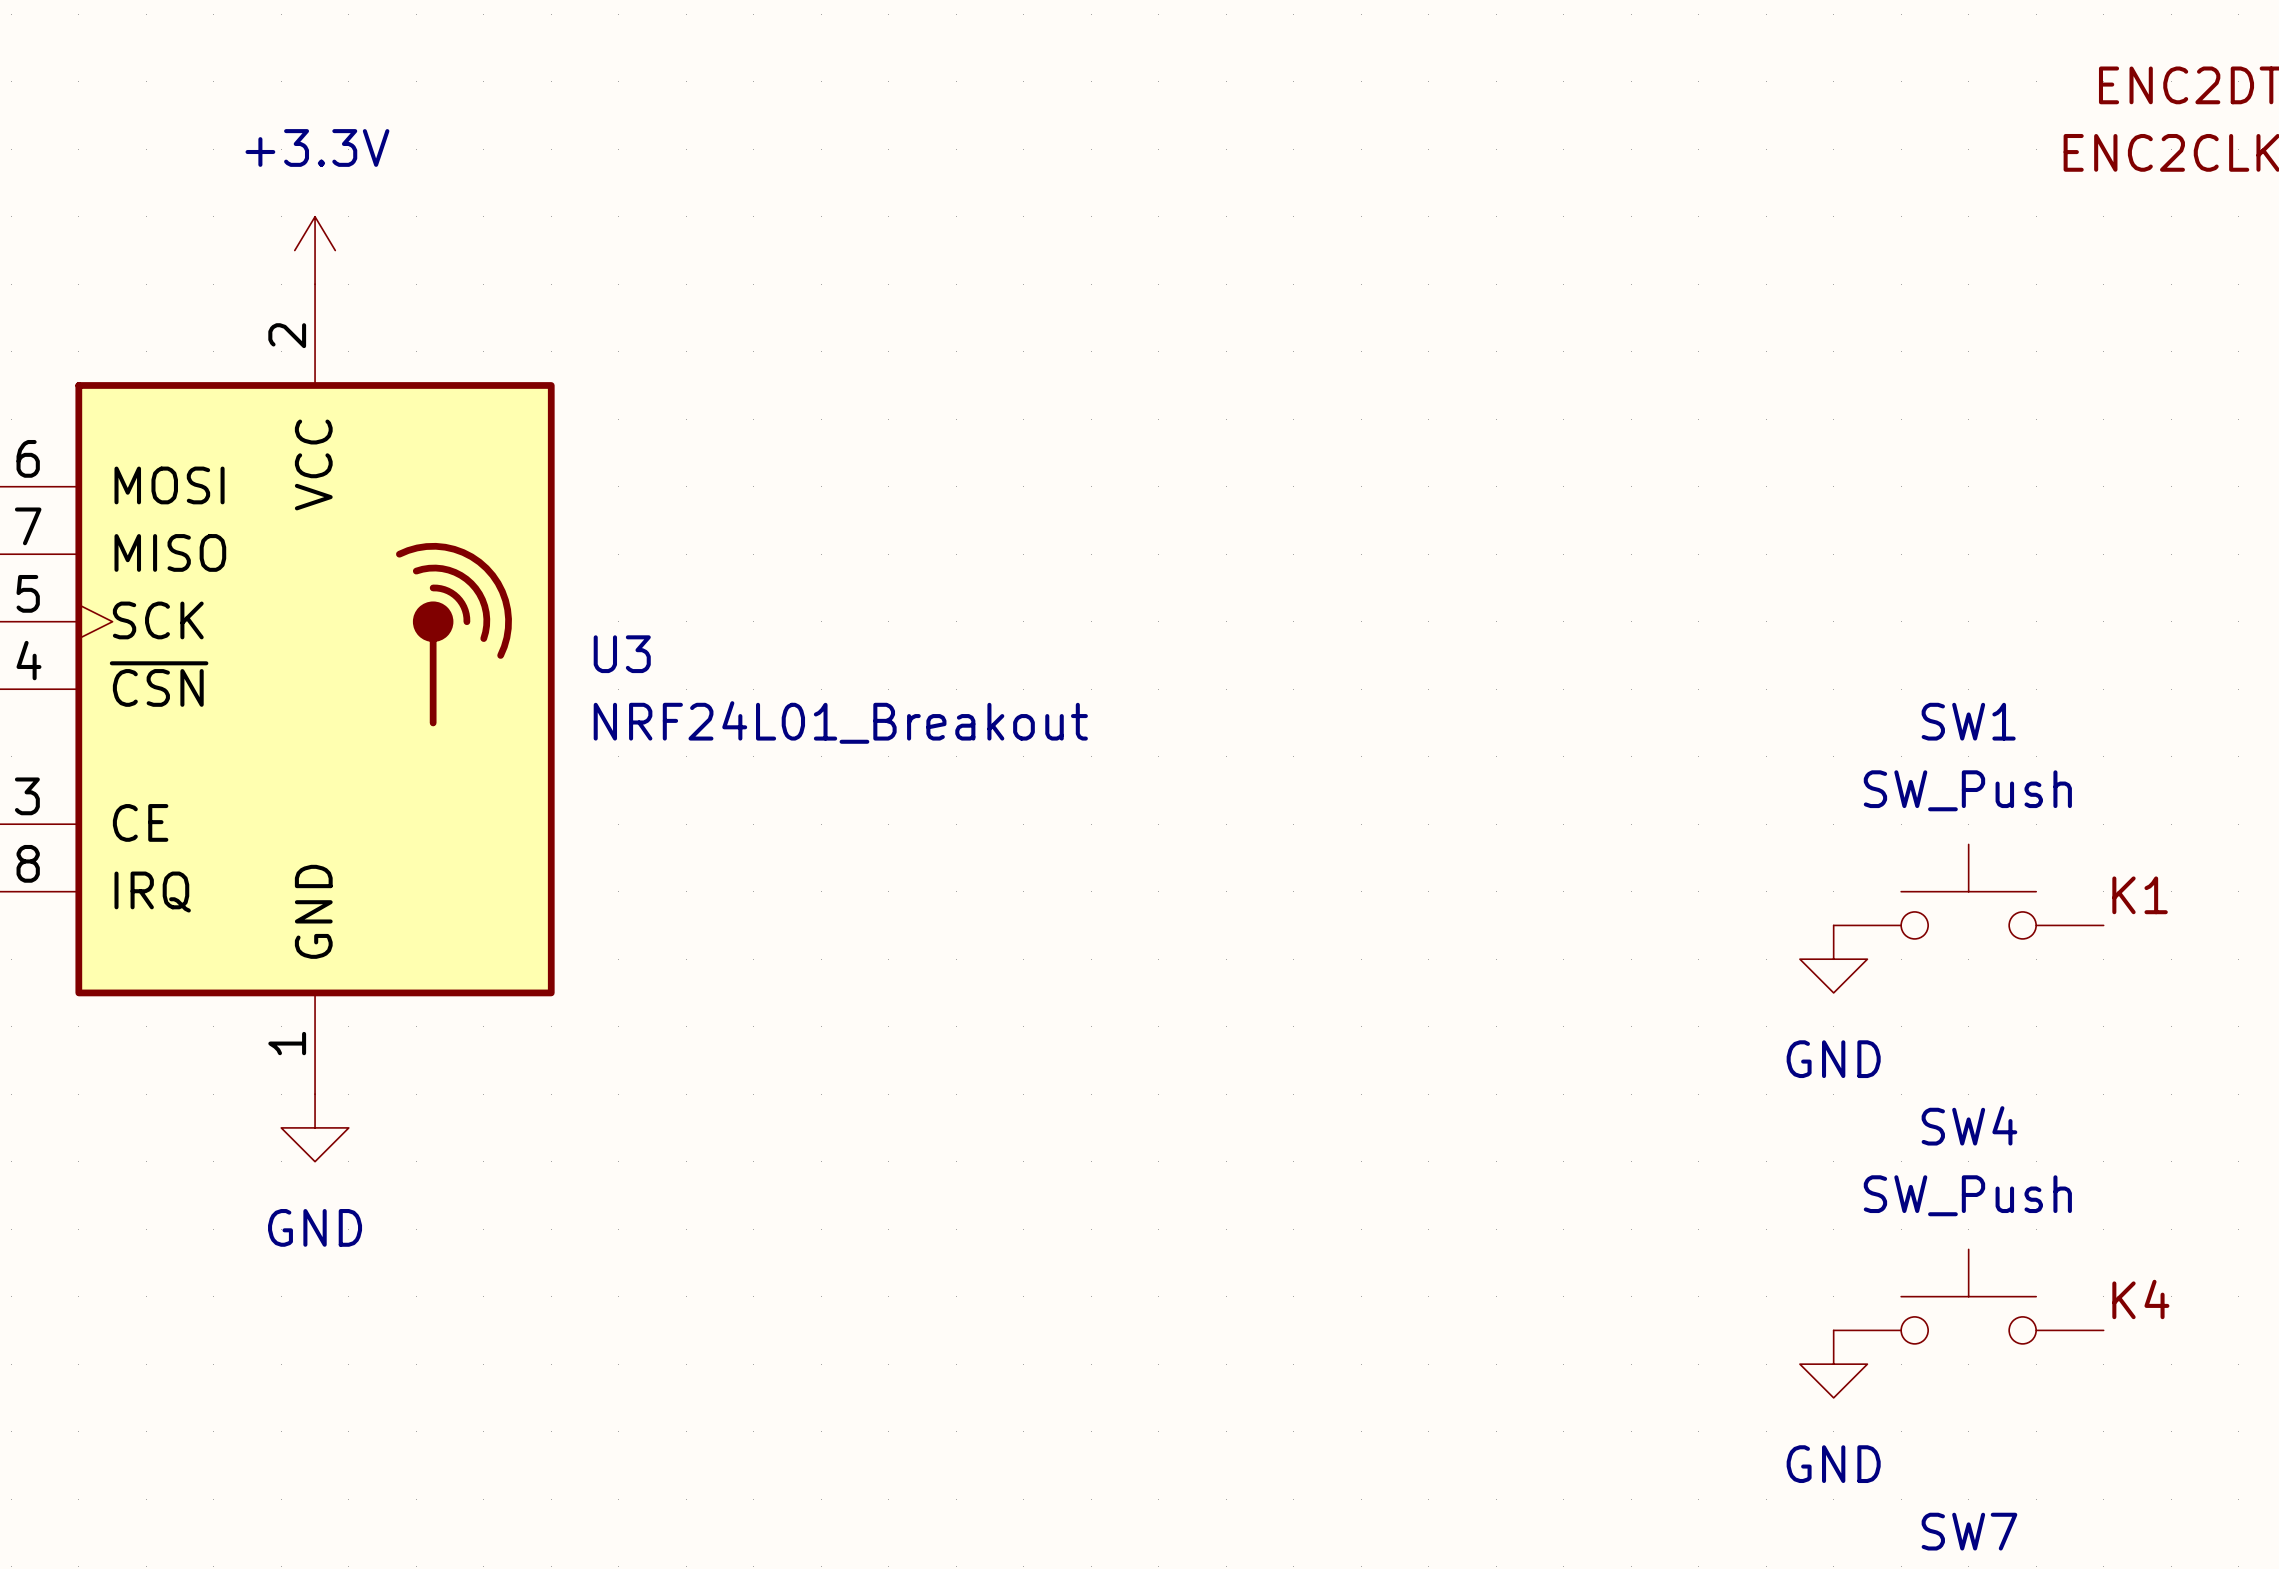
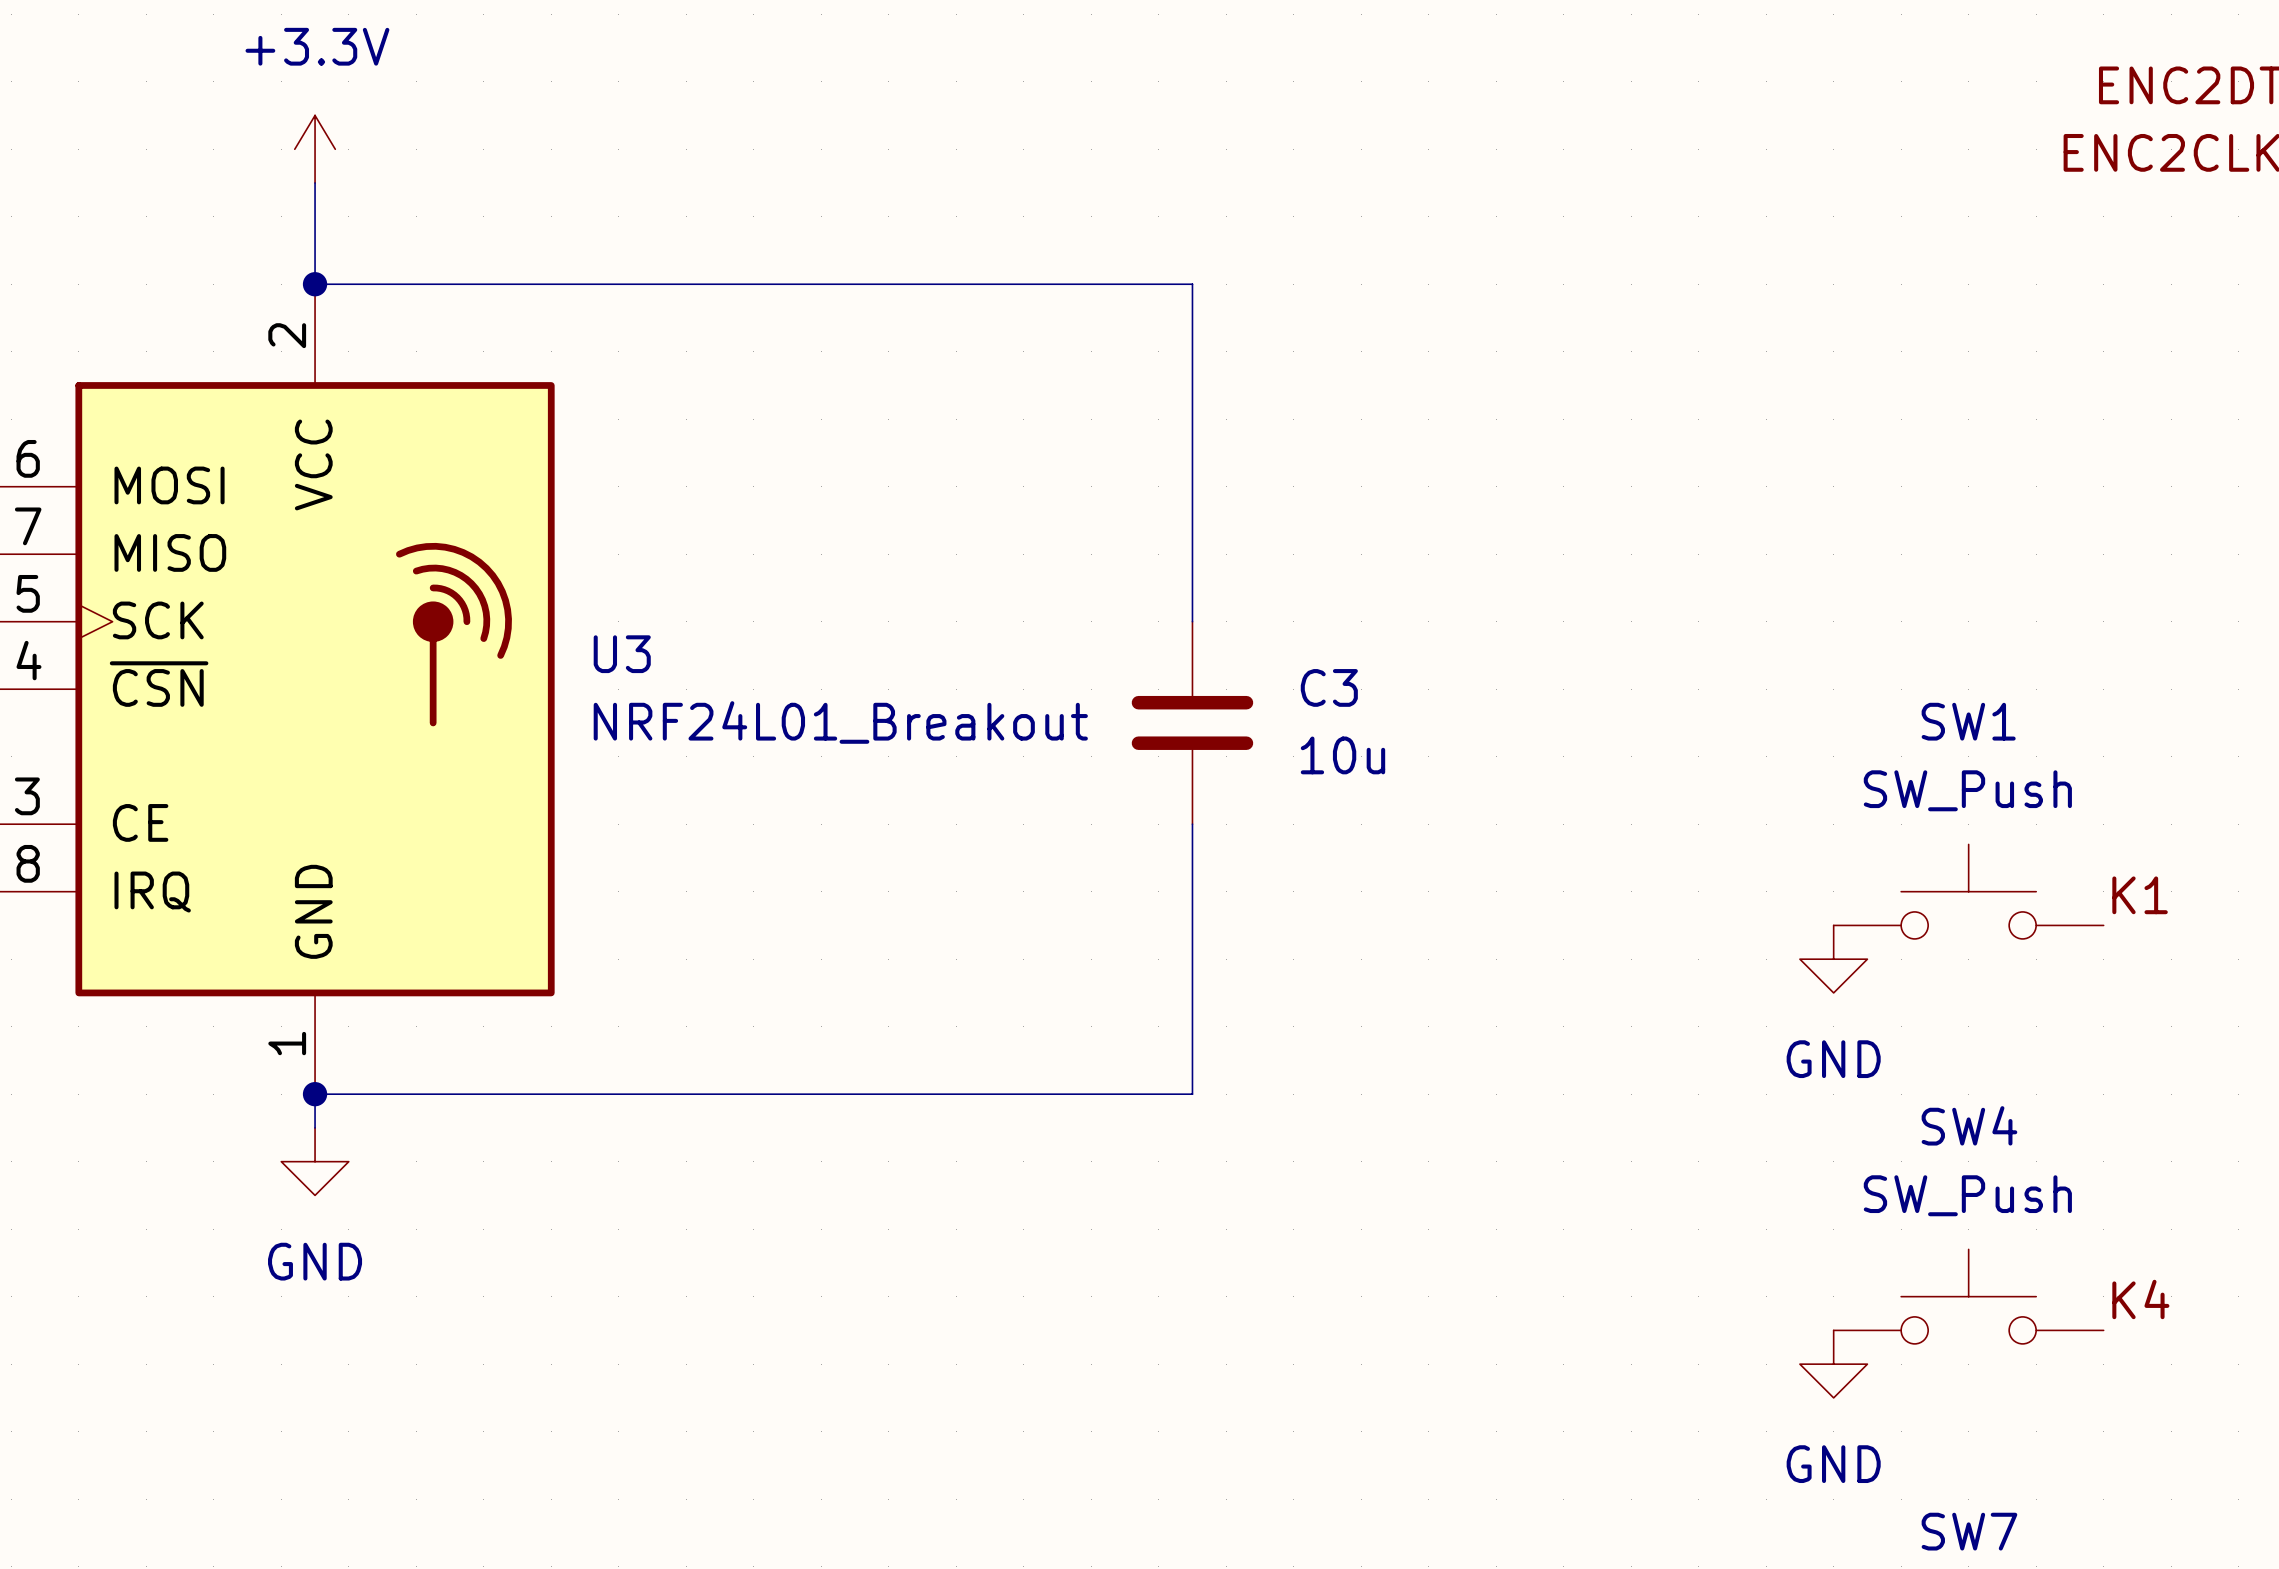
wire: none -> (315, 182) (315, 284) (1192, 284) (1192, 621)
power symbol position: +3.3V (315, 250) -> +3.3V (315, 149)
junction: none -> (315, 284)
C3: none -> 10u (1192, 722)
wire: none -> (1192, 824) (1192, 1094) (315, 1094) (315, 1127)
junction: none -> (315, 1094)
power symbol position: GND (315, 1127) -> GND (315, 1161)

